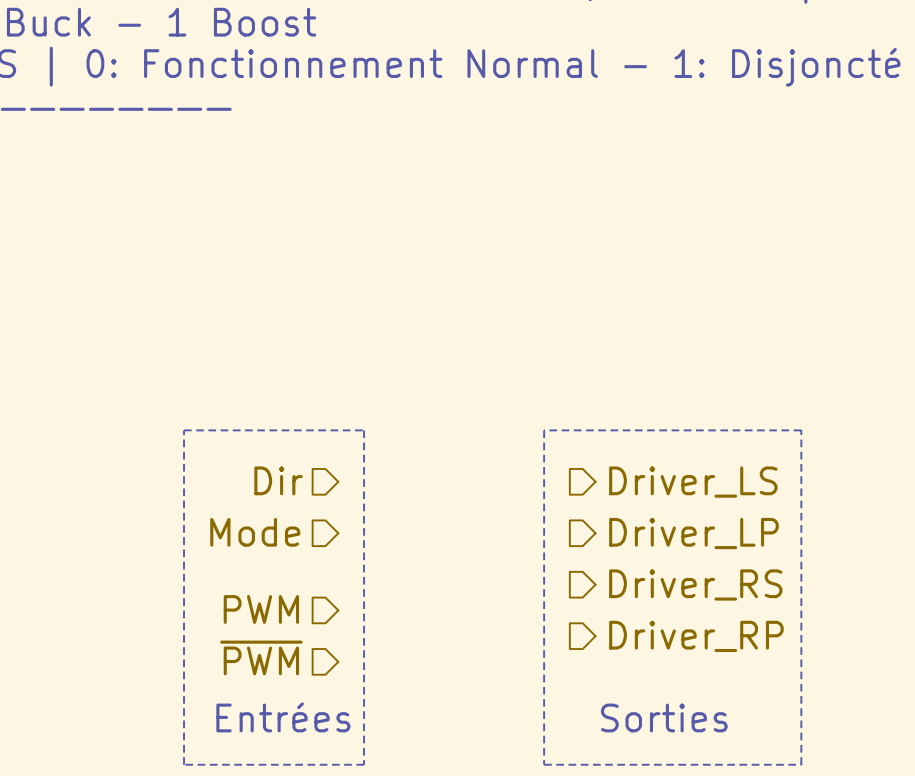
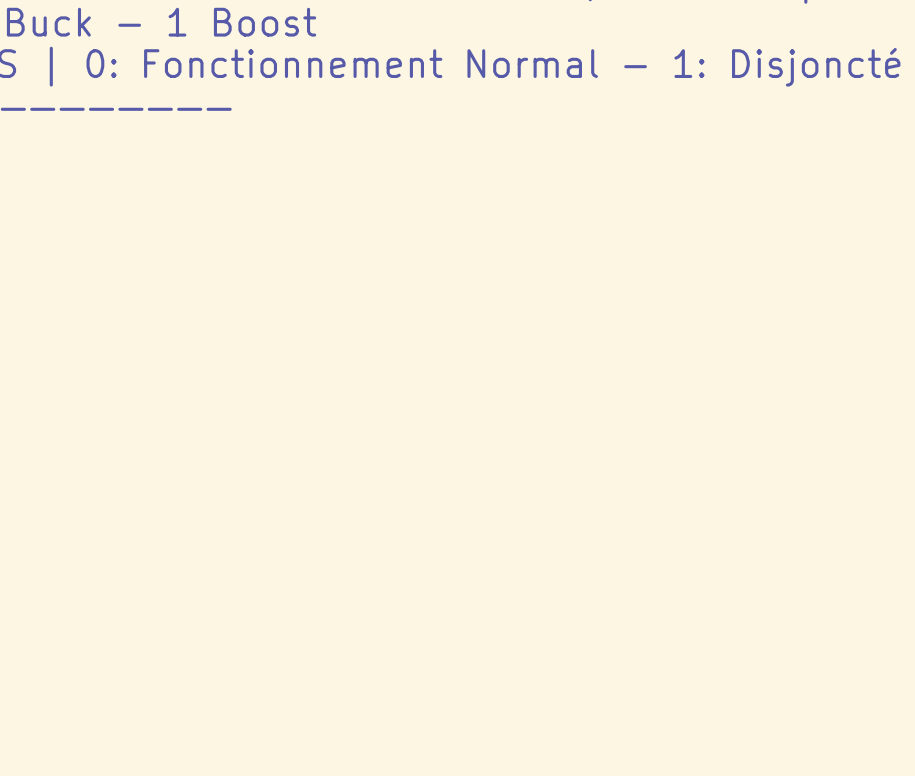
line: (184, 430) (364, 430) (364, 764) (184, 764) (184, 430) -> none
line: (544, 430) (801, 430) (801, 764) (544, 764) (544, 430) -> none
hierarchical label: Dir (278, 480) -> none
hierarchical label: Driver_LS (693, 482) -> none
hierarchical label: Mode (255, 532) -> none
hierarchical label: Driver_LP (693, 533) -> none
hierarchical label: Driver_RS (695, 584) -> none
hierarchical label: PWM (261, 609) -> none
hierarchical label: Driver_RP (696, 636) -> none
hierarchical label: ~{PWM} (261, 657) -> none
text: Entrées (283, 717) -> none
text: Sorties (664, 717) -> none

